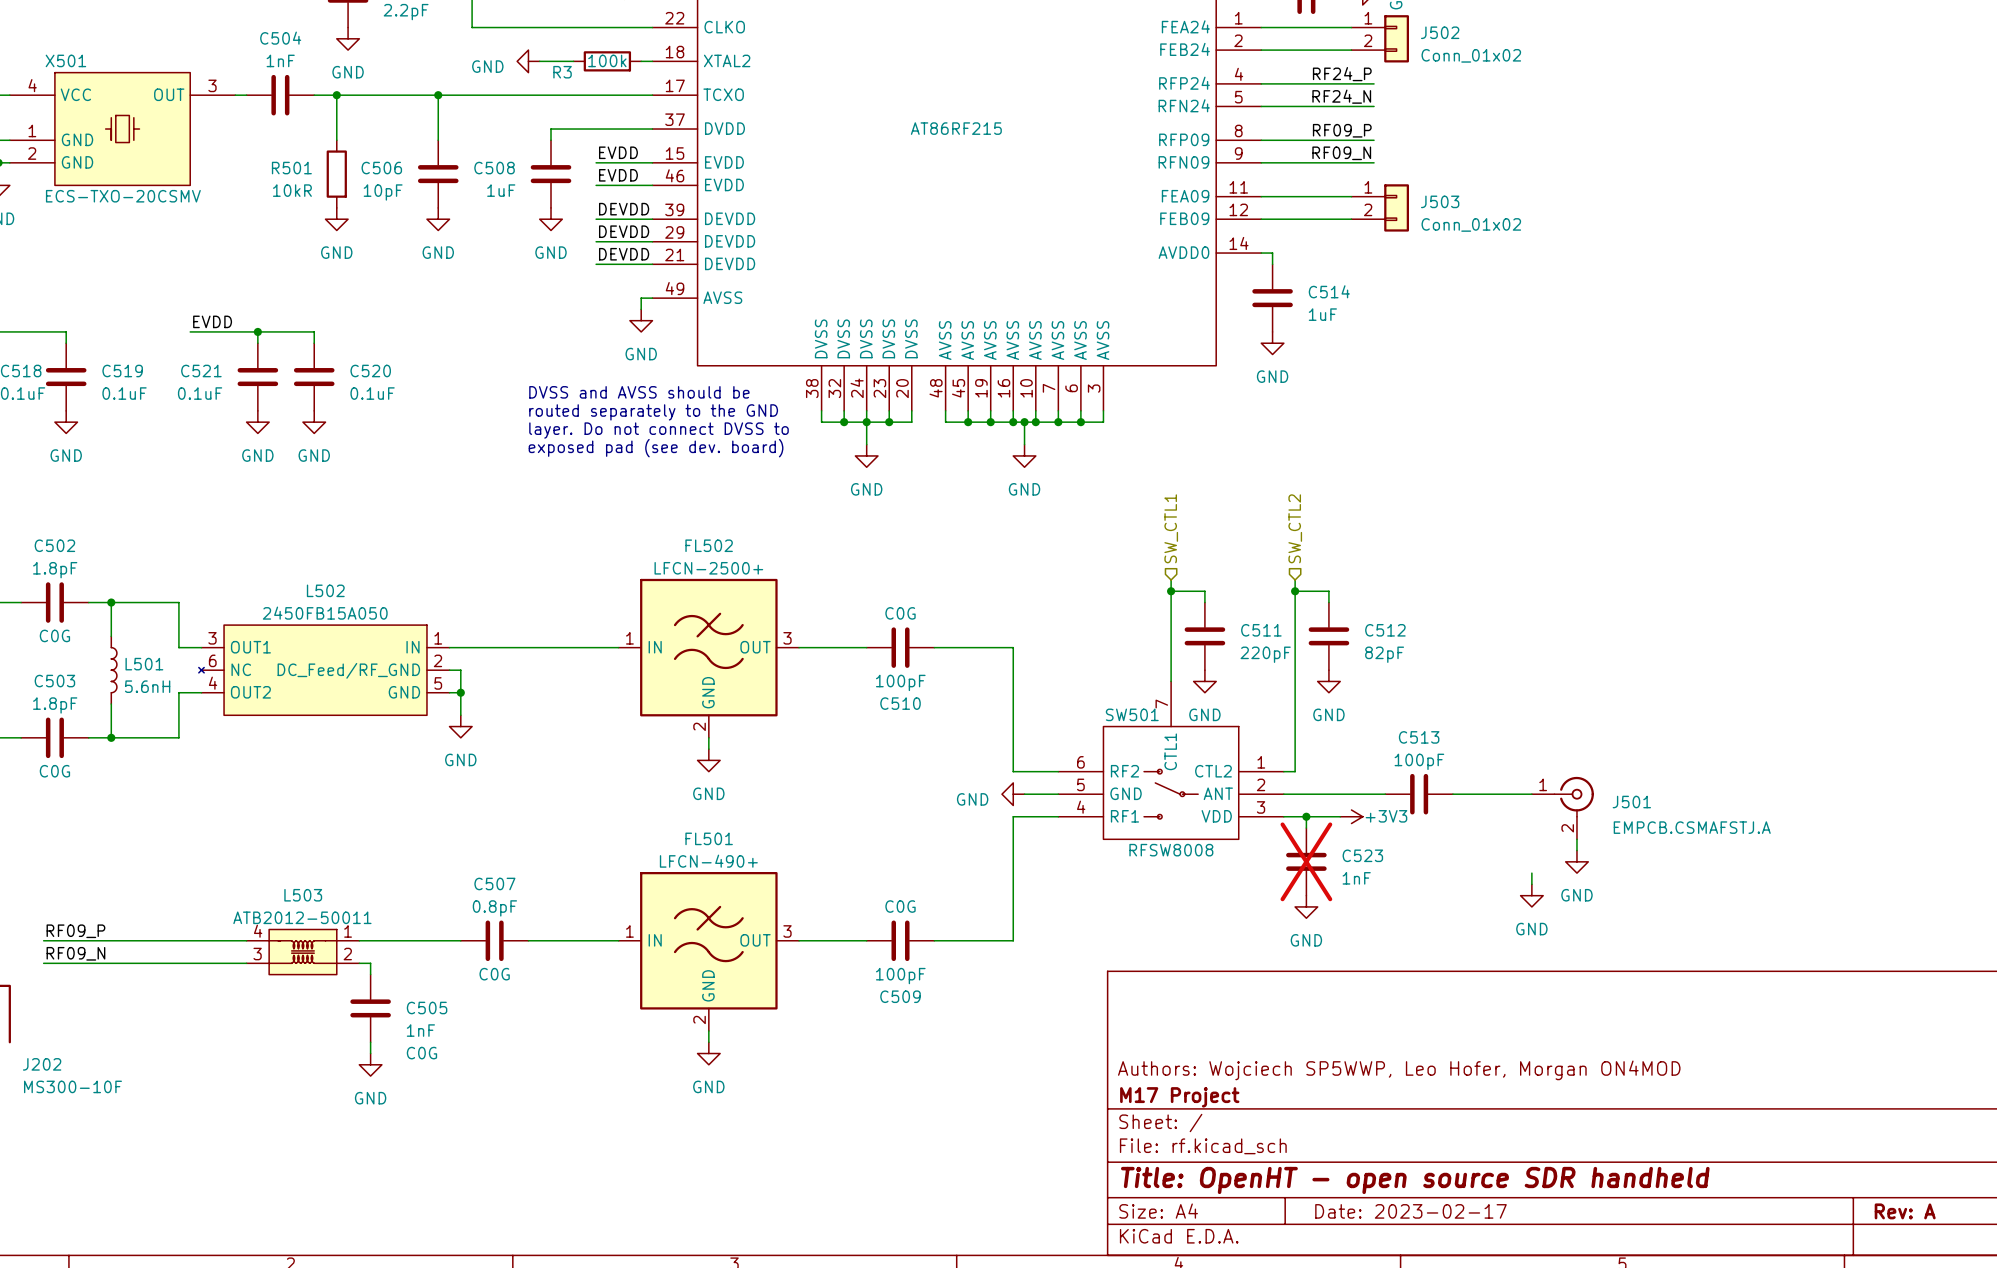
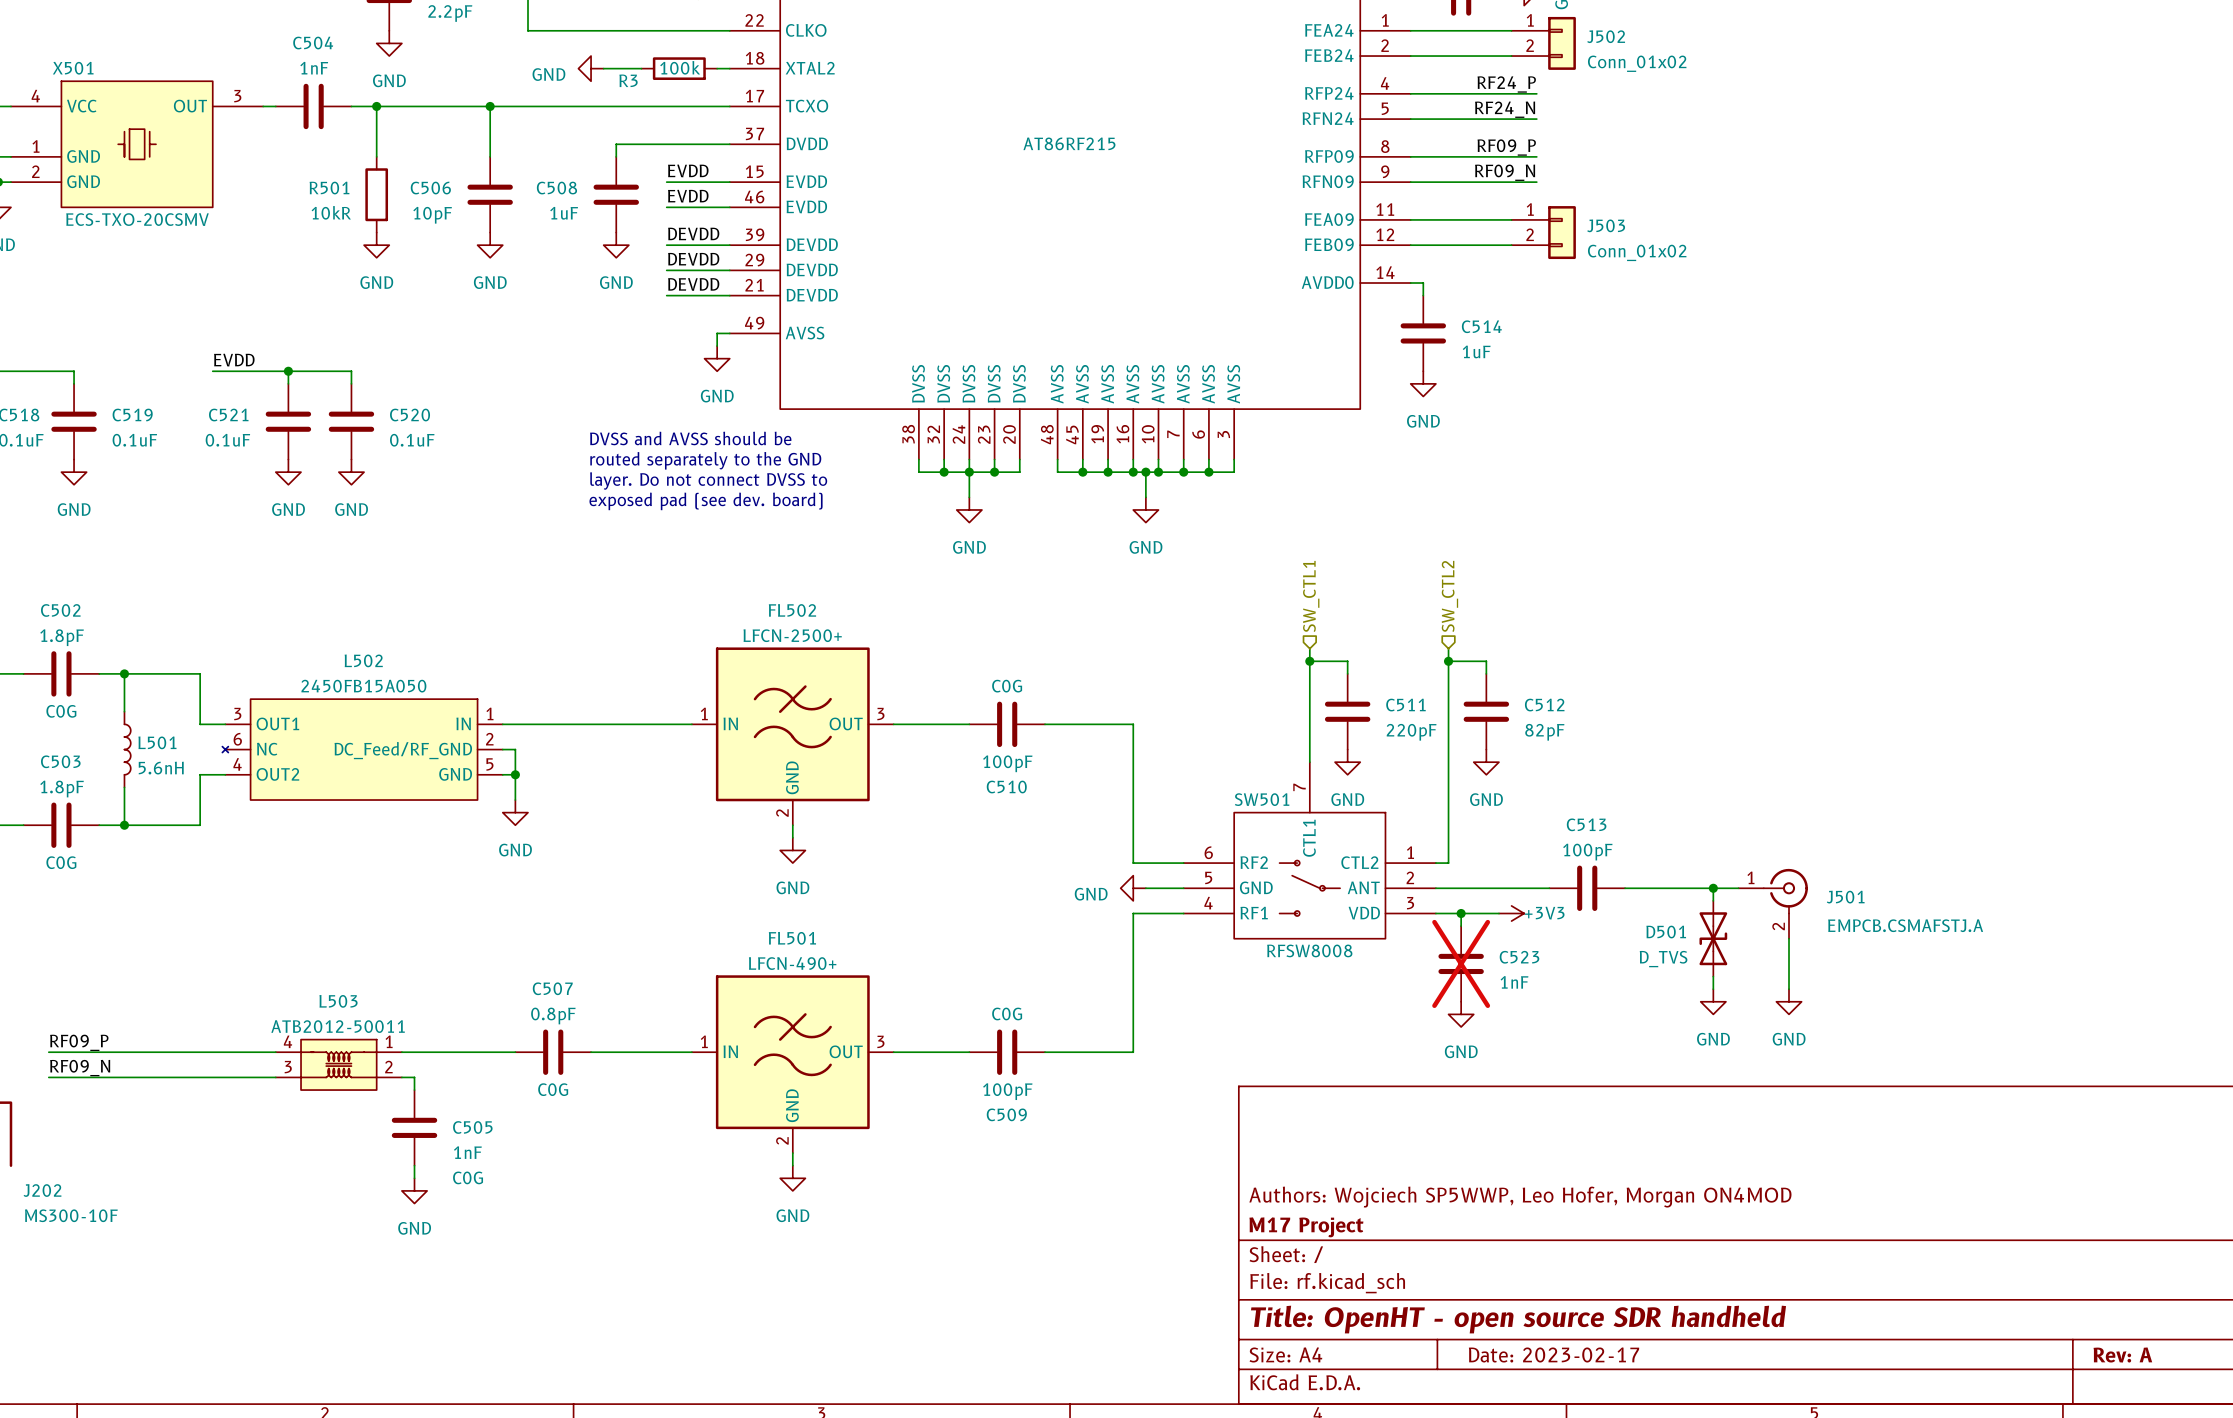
junction: none -> (1713, 888)
J501 position: (1562, 808) -> (1773, 903)
D501: none -> D_TVS (1713, 938)
wire: (1576, 839) (1576, 850) -> none
wire: none -> (1789, 938) (1789, 989)
power symbol position: GND (1576, 861) -> GND (1789, 1001)

